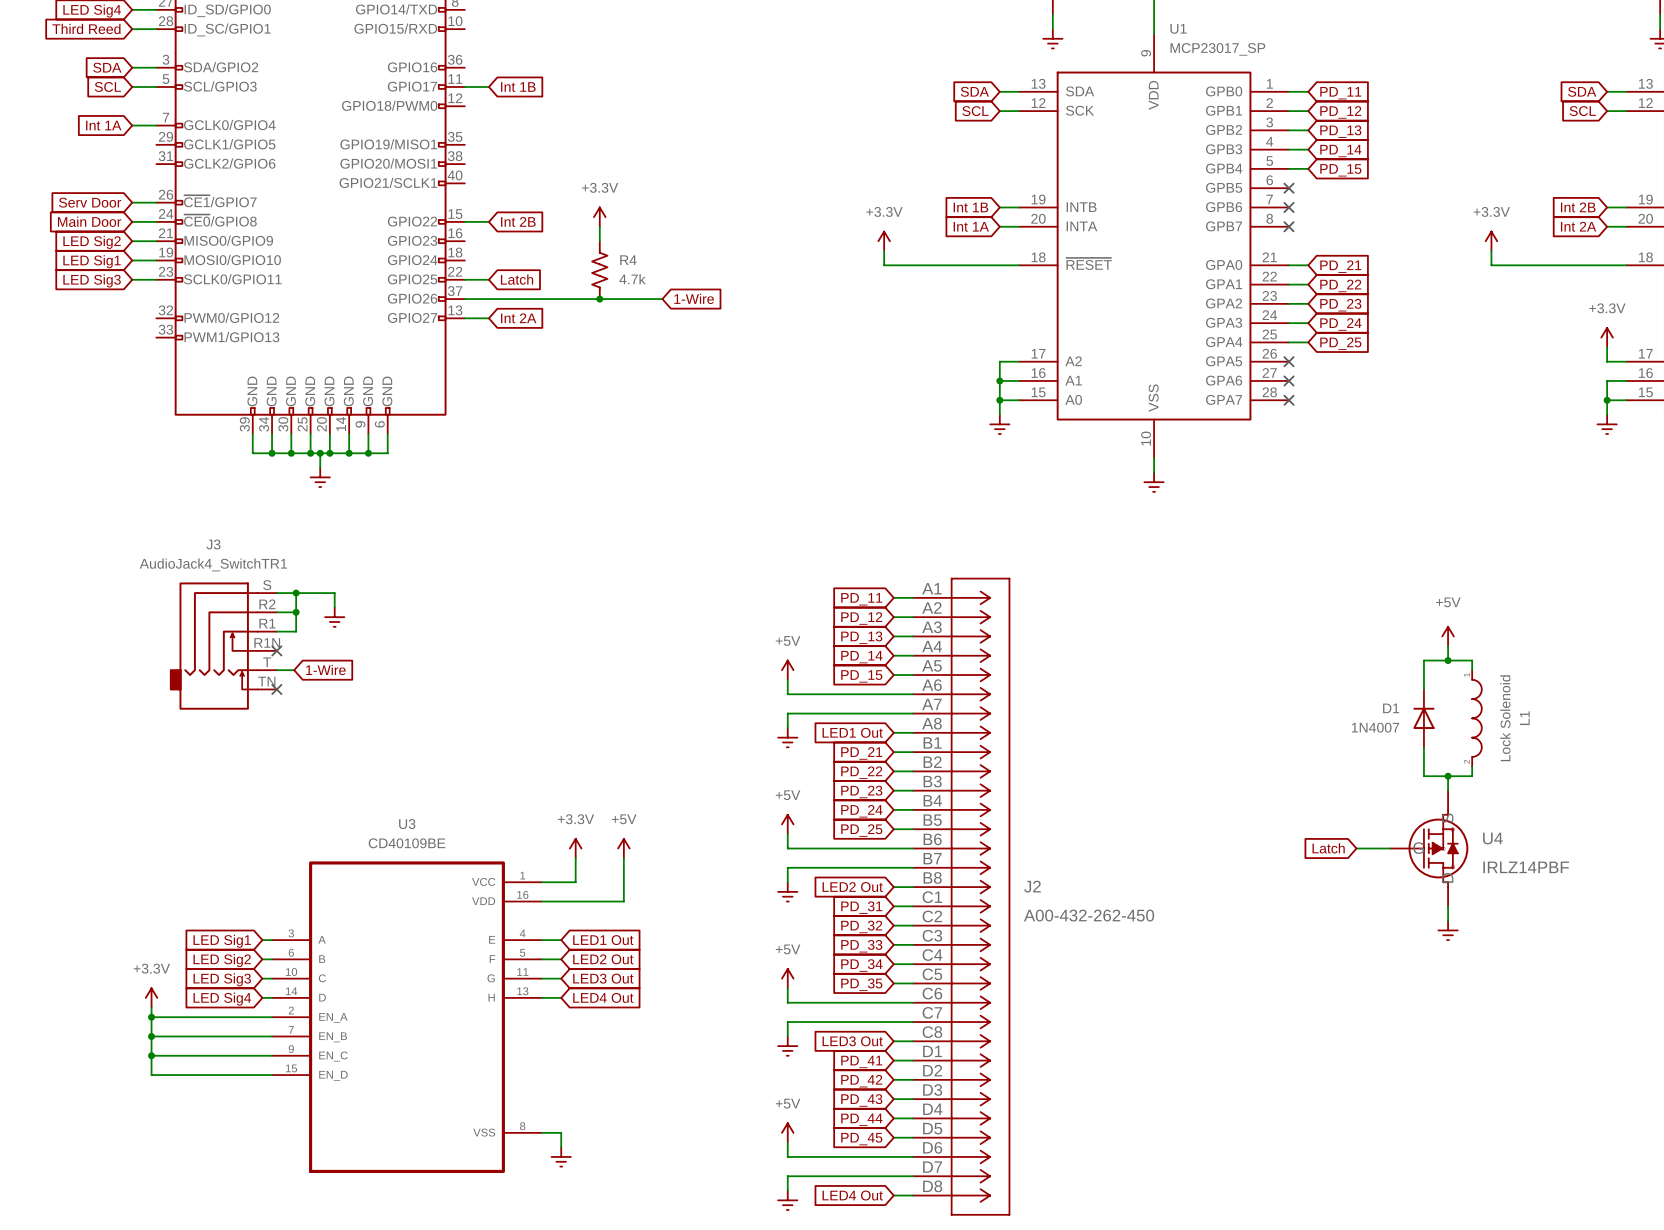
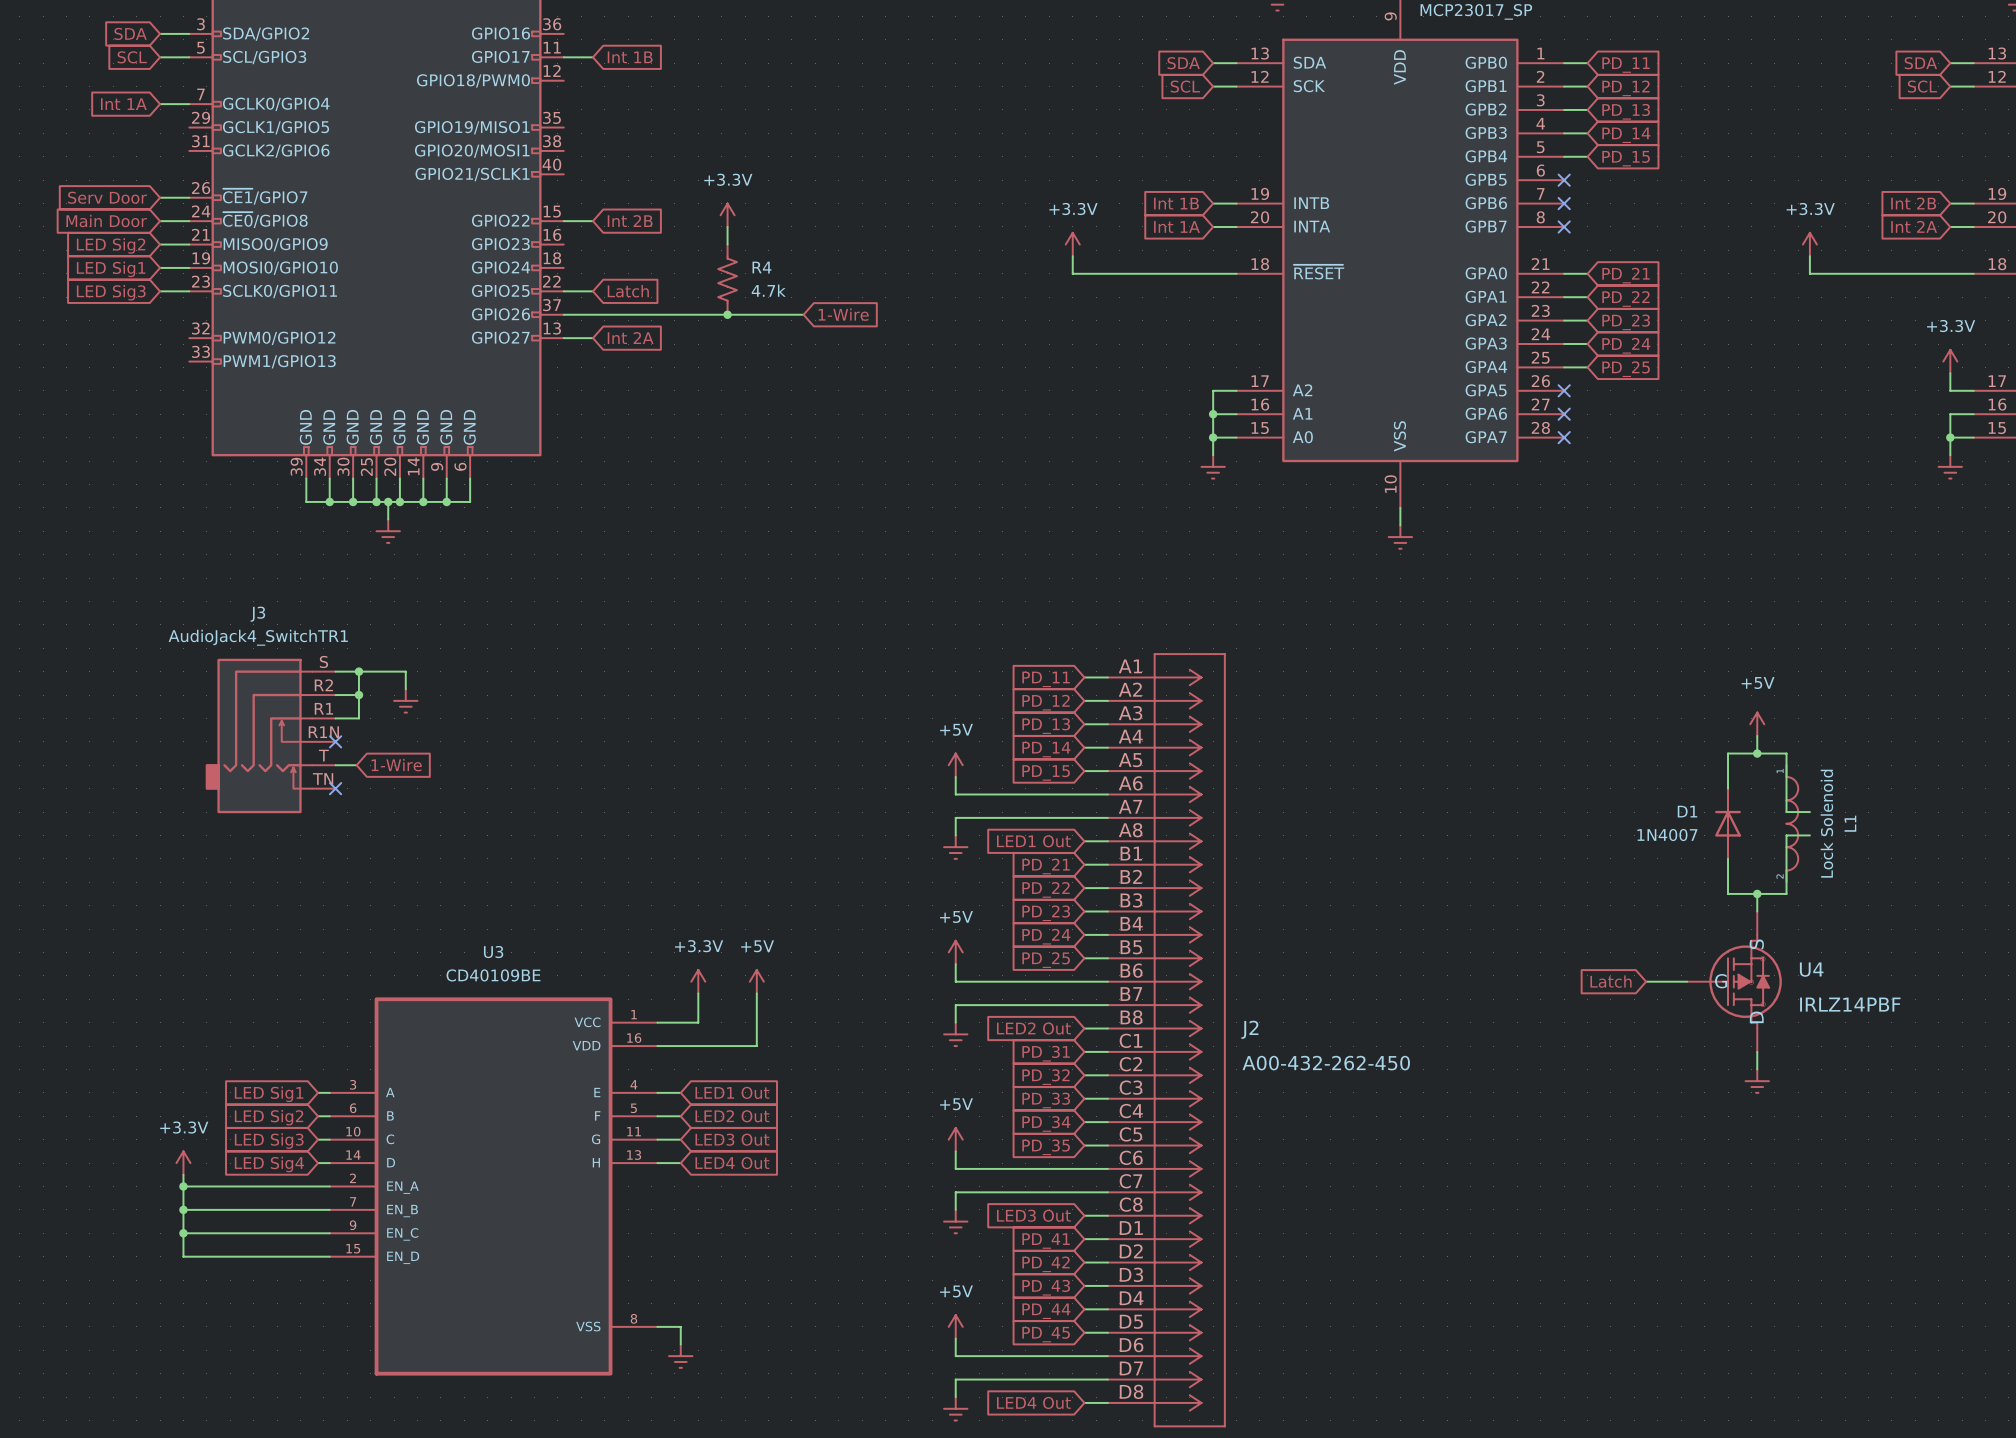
wire: none -> (1786, 765) (1786, 812) (1809, 812)
wire: none -> (1809, 835) (1786, 835) (1786, 882)

